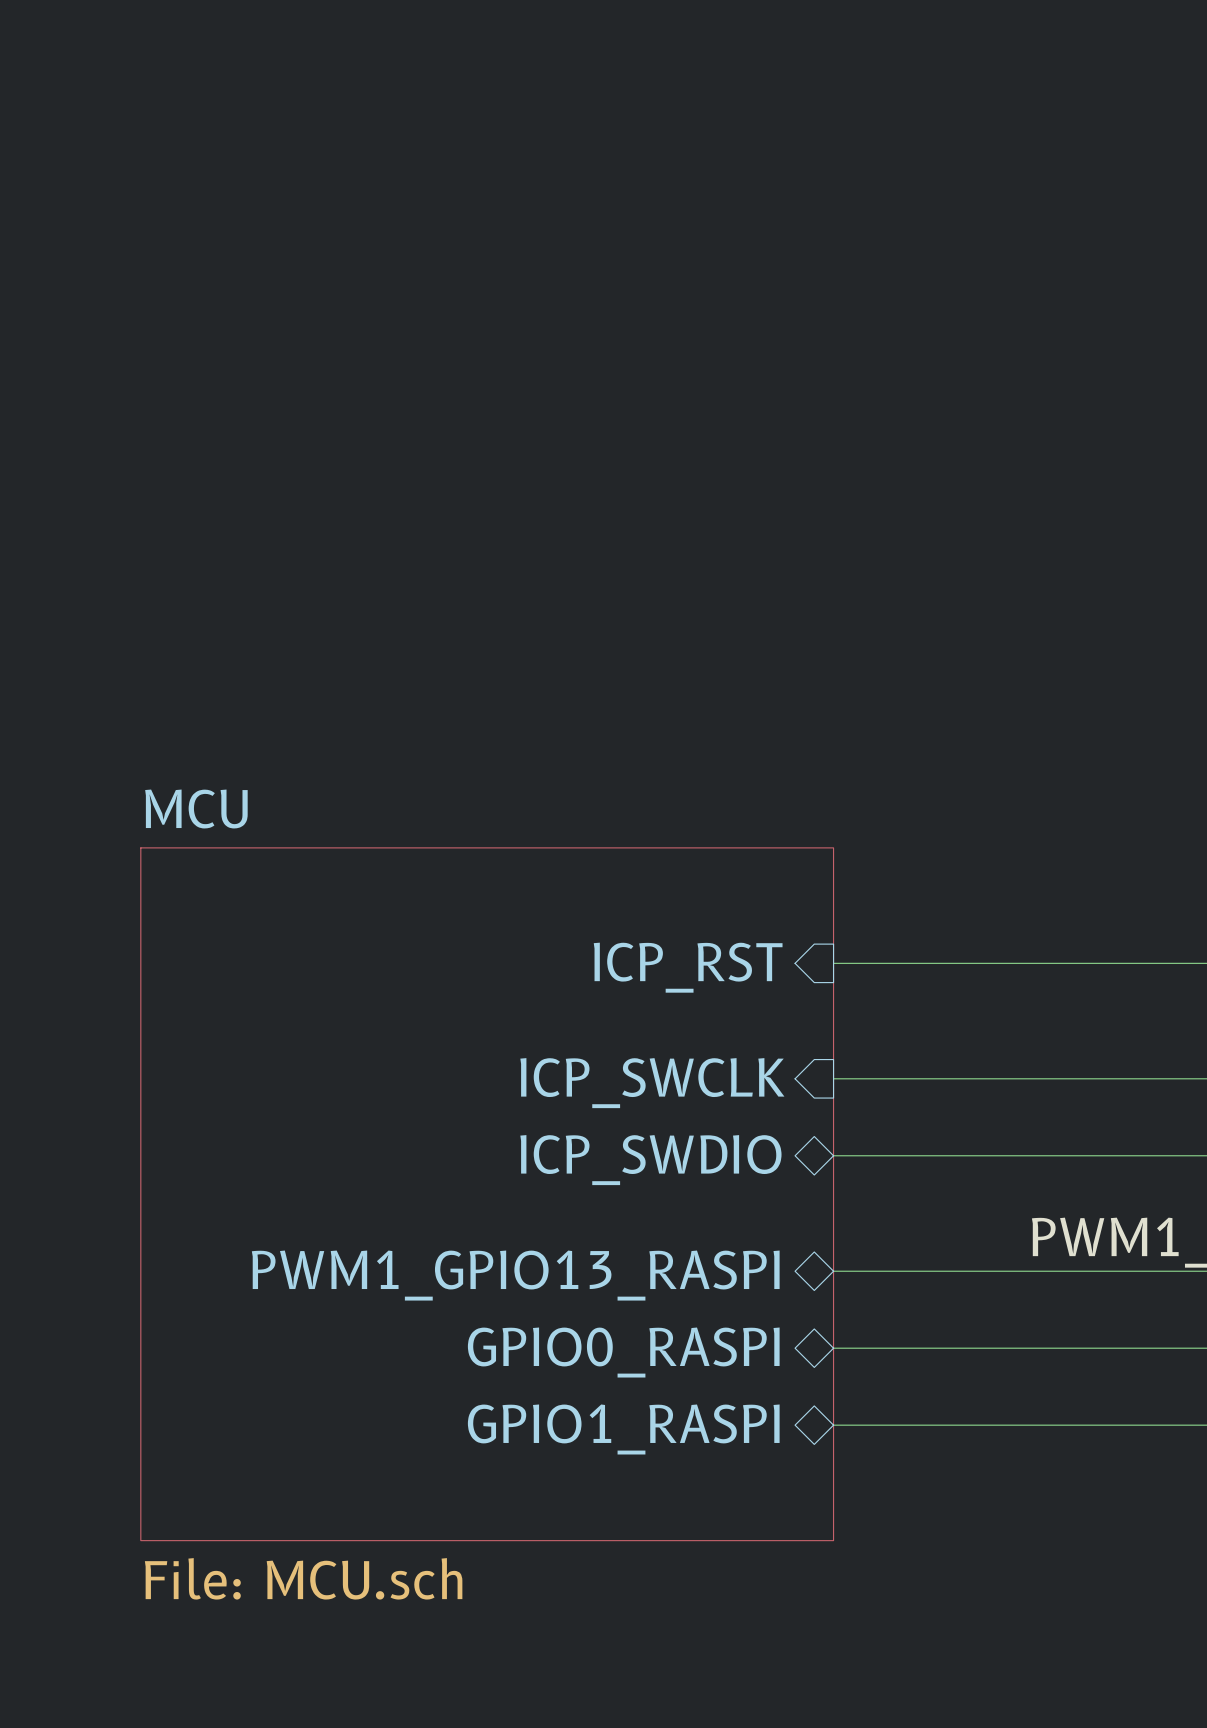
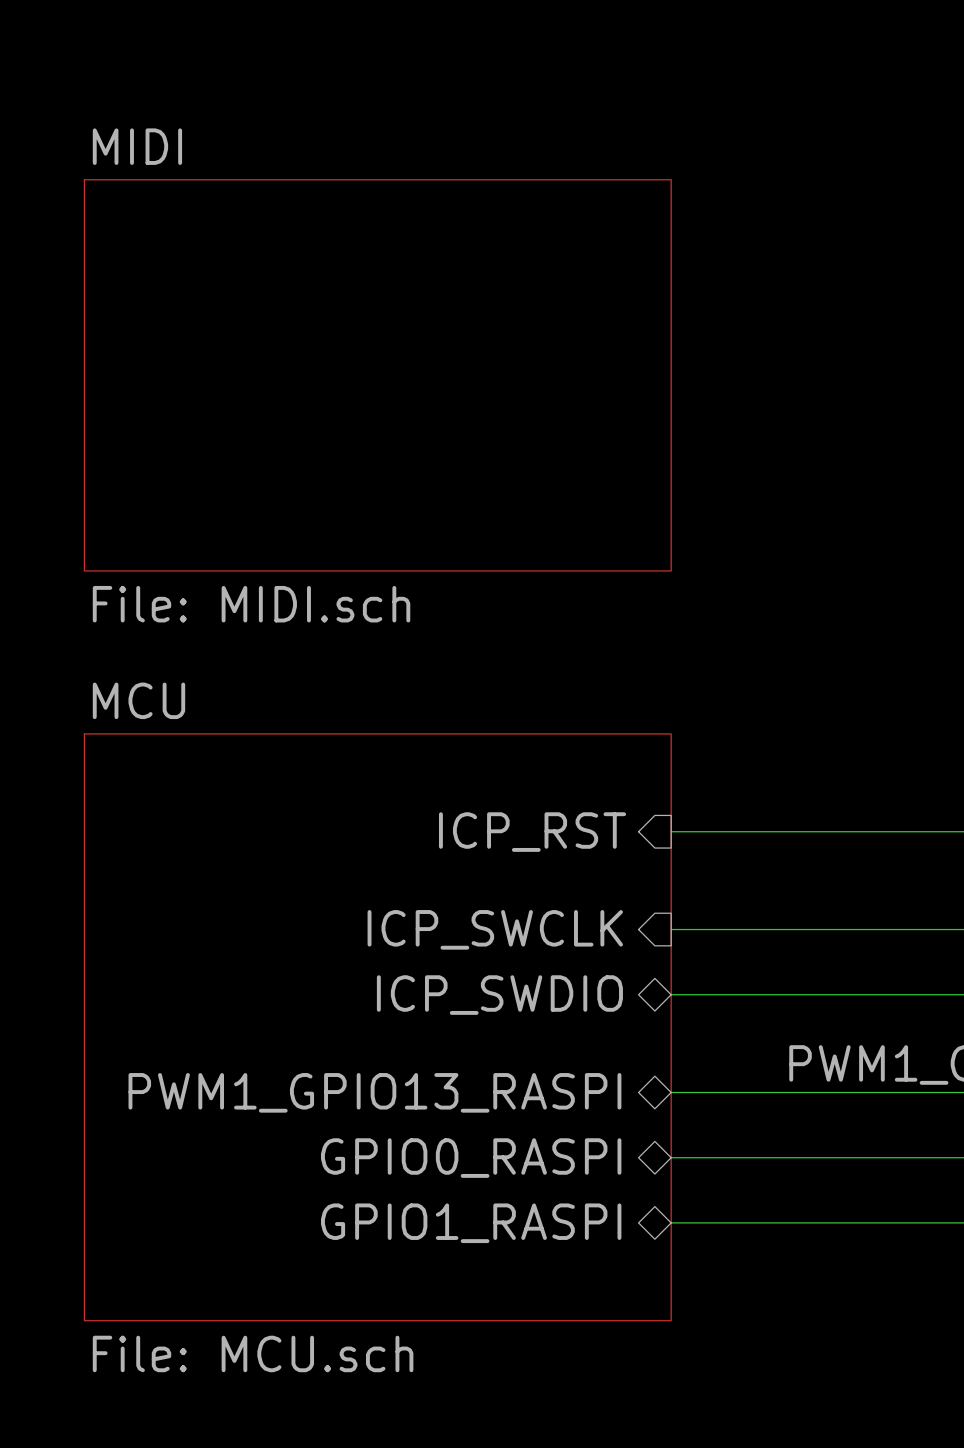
sheet MIDI: none -> File: MIDI.sch (377, 375)

